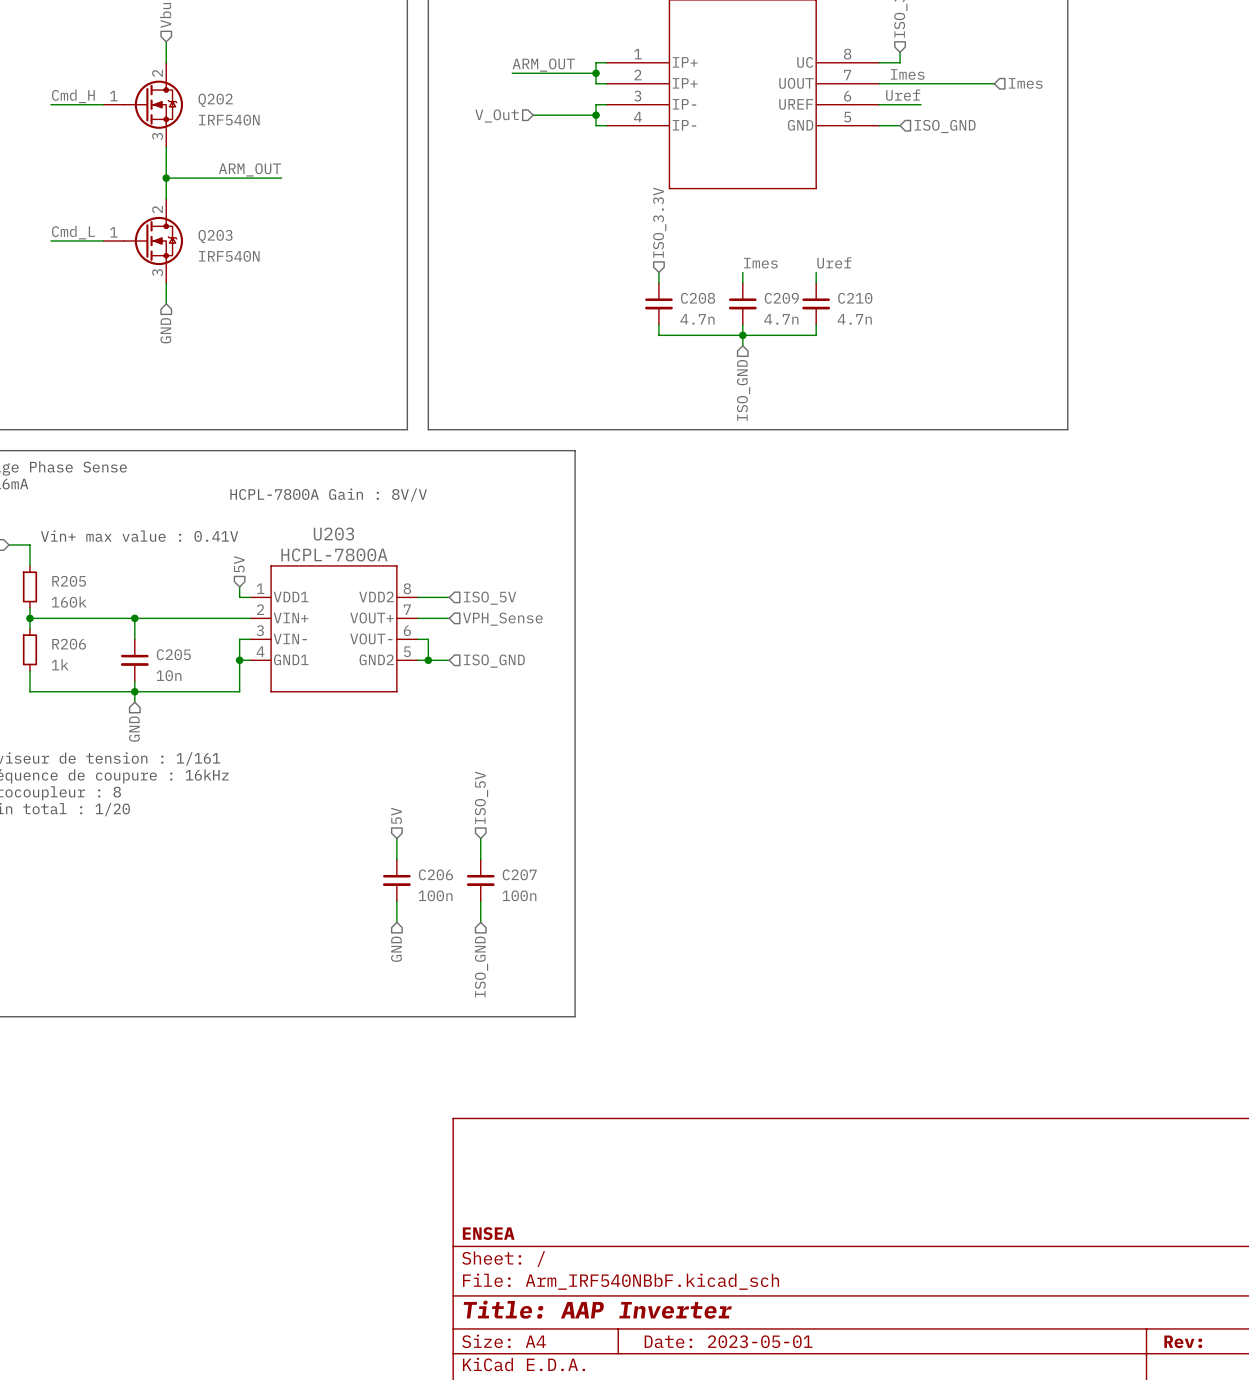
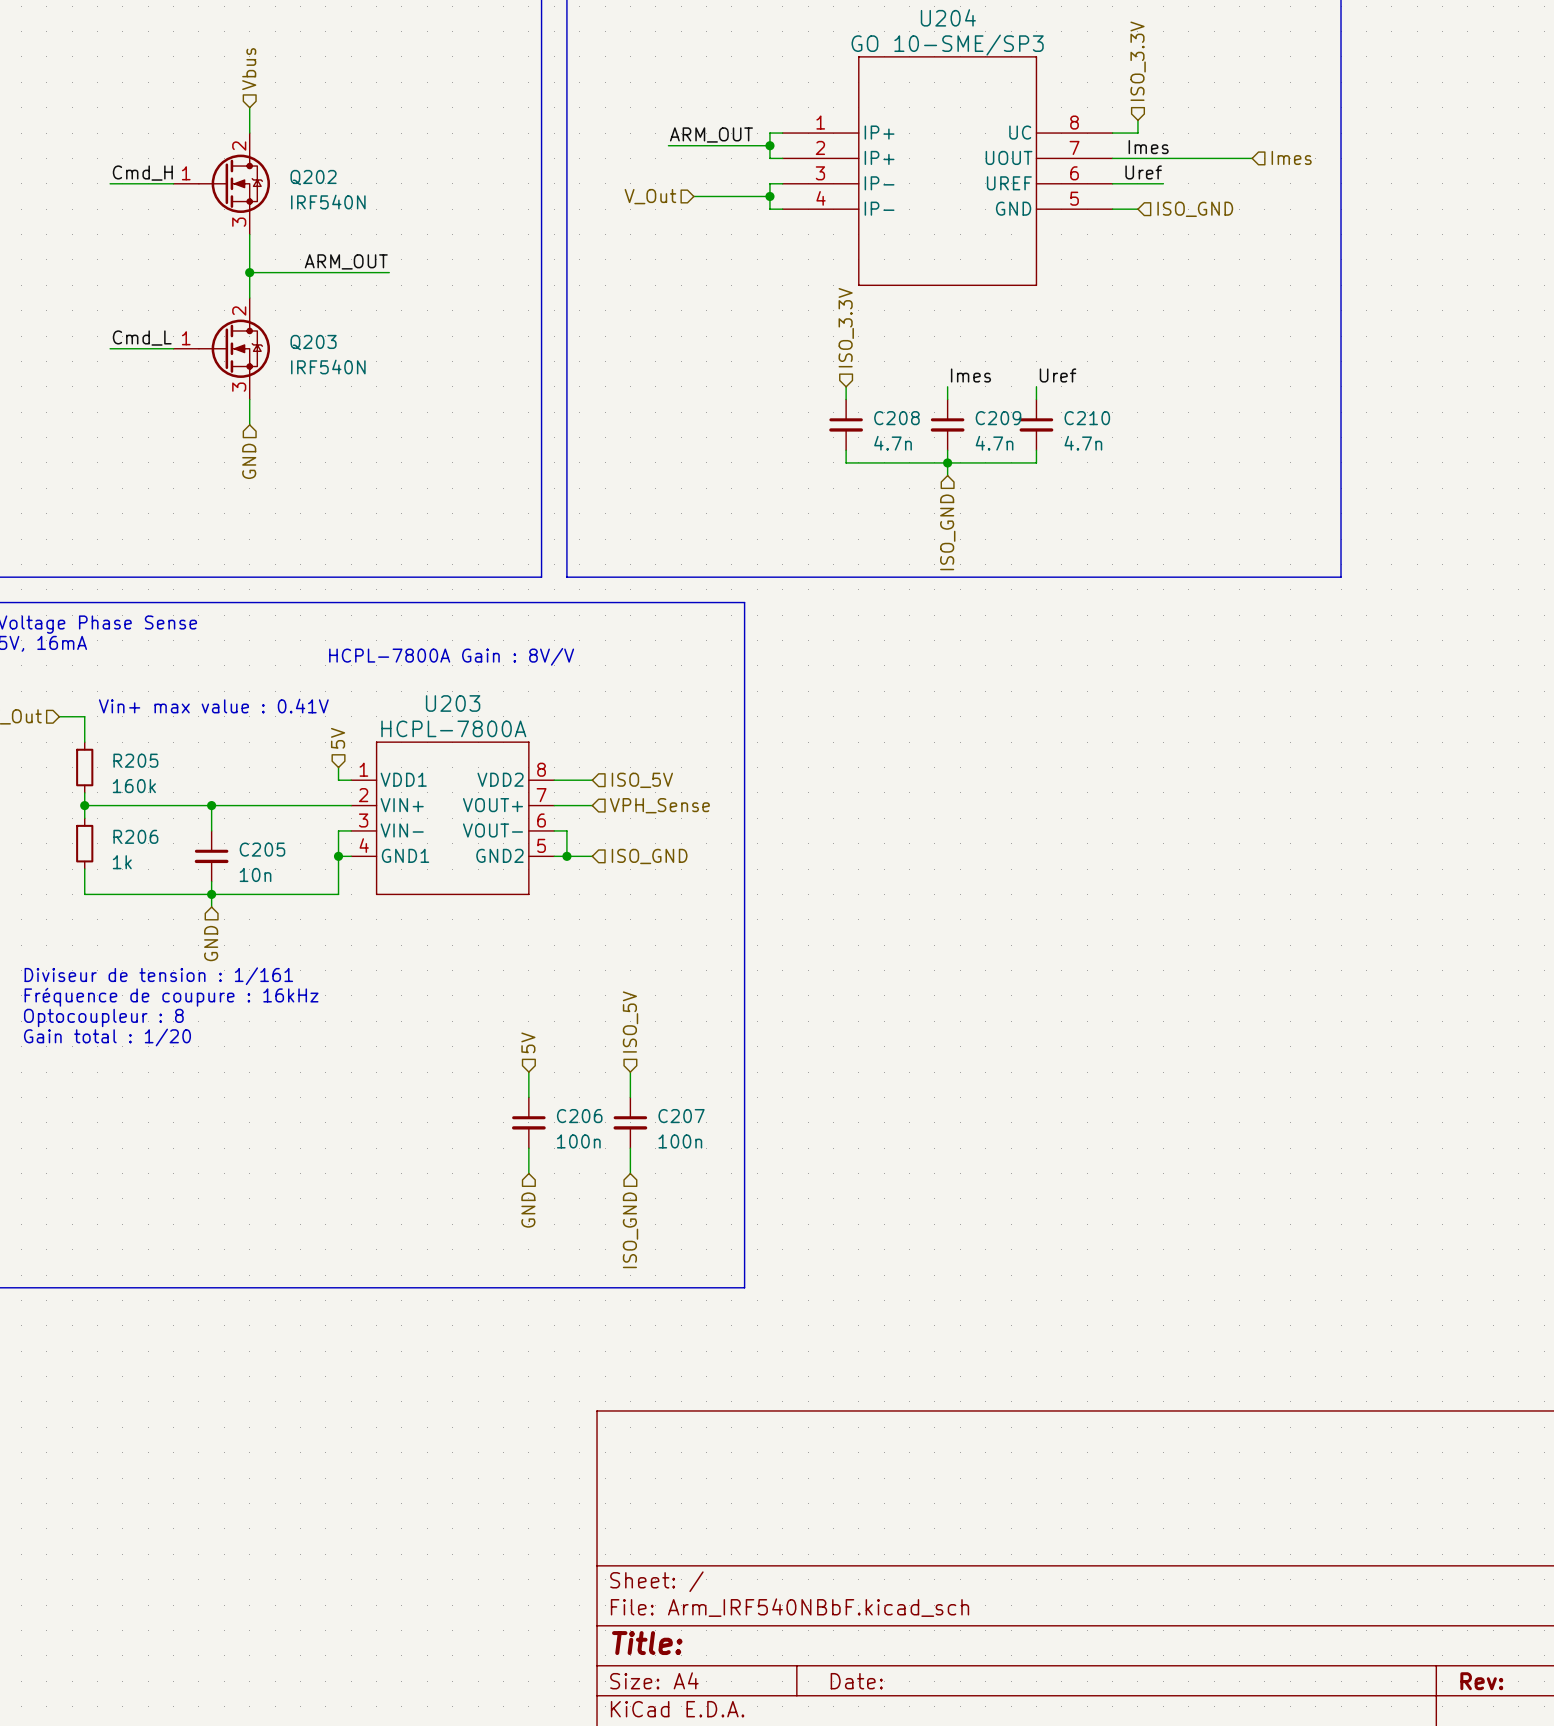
title block: ENSEA (488, 1233) -> none
title block: Title: AAP Inverter (597, 1309) -> Title: (647, 1643)
title block: Date: 2023-05-01 (728, 1341) -> Date: (856, 1681)

